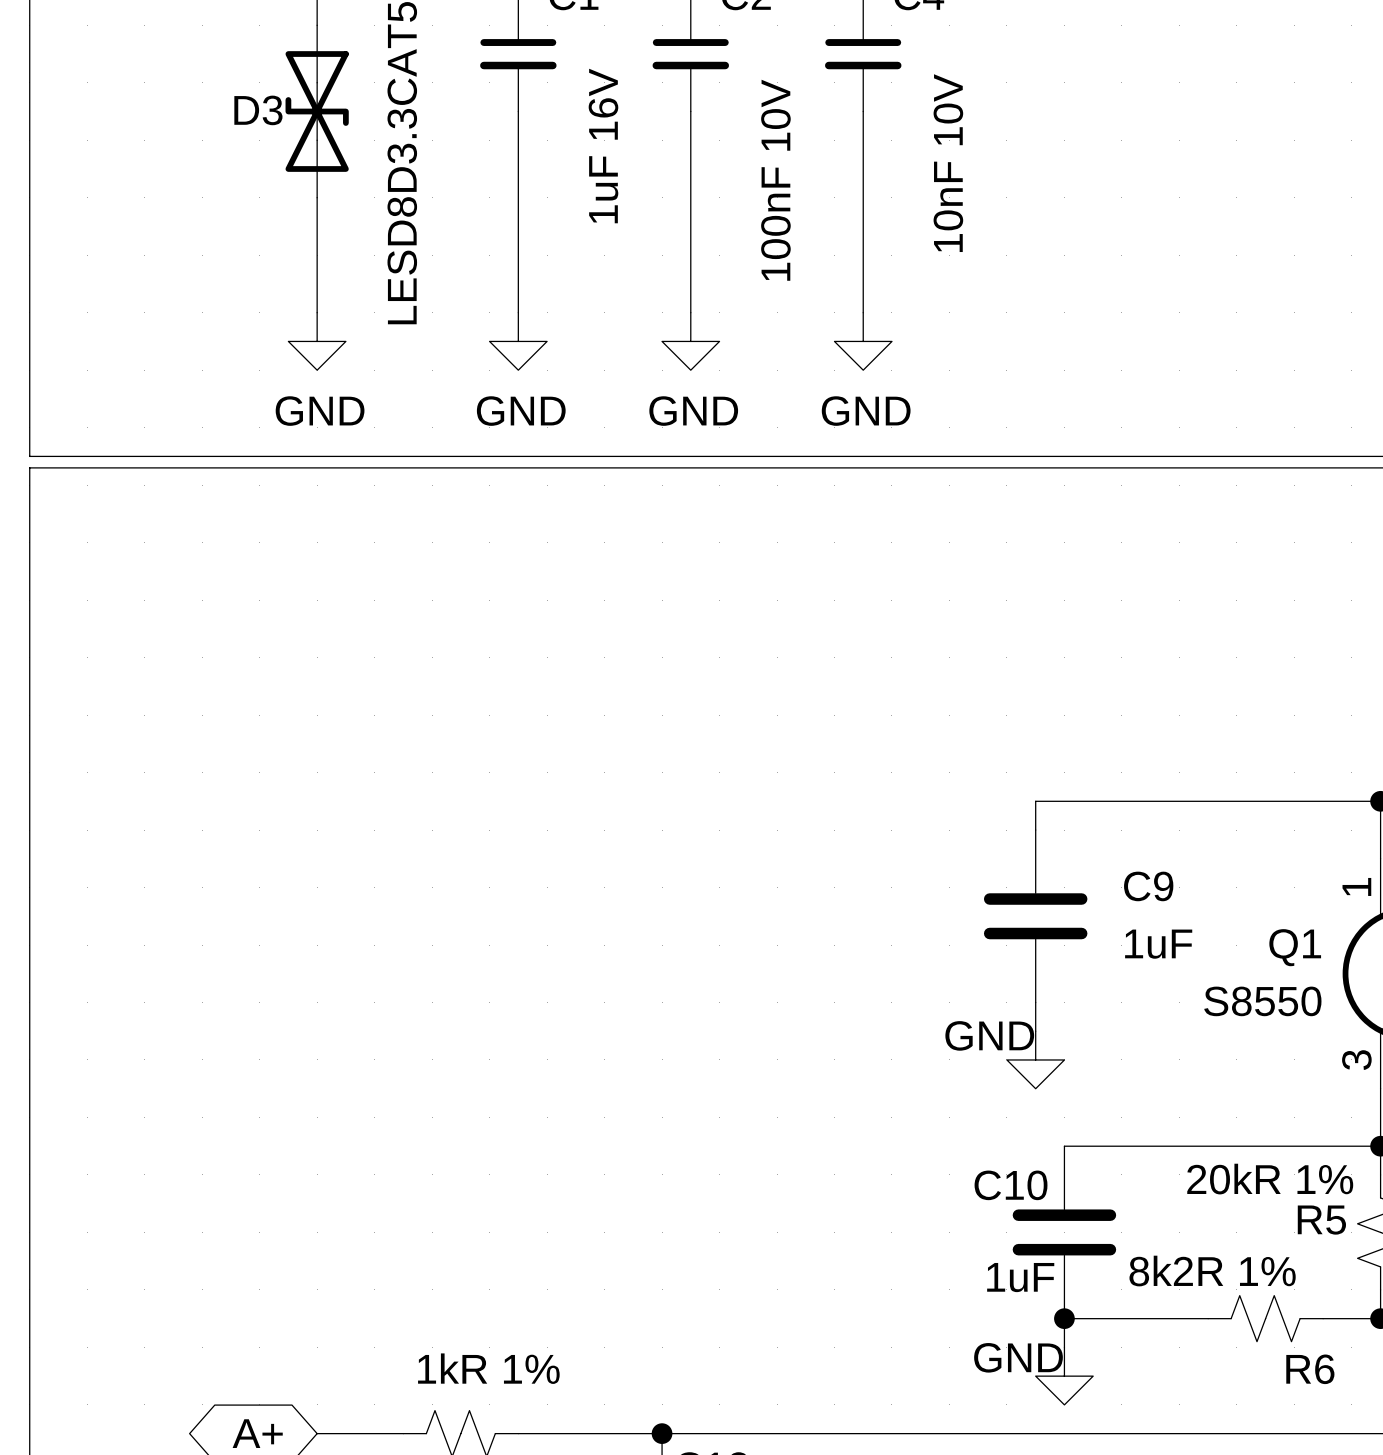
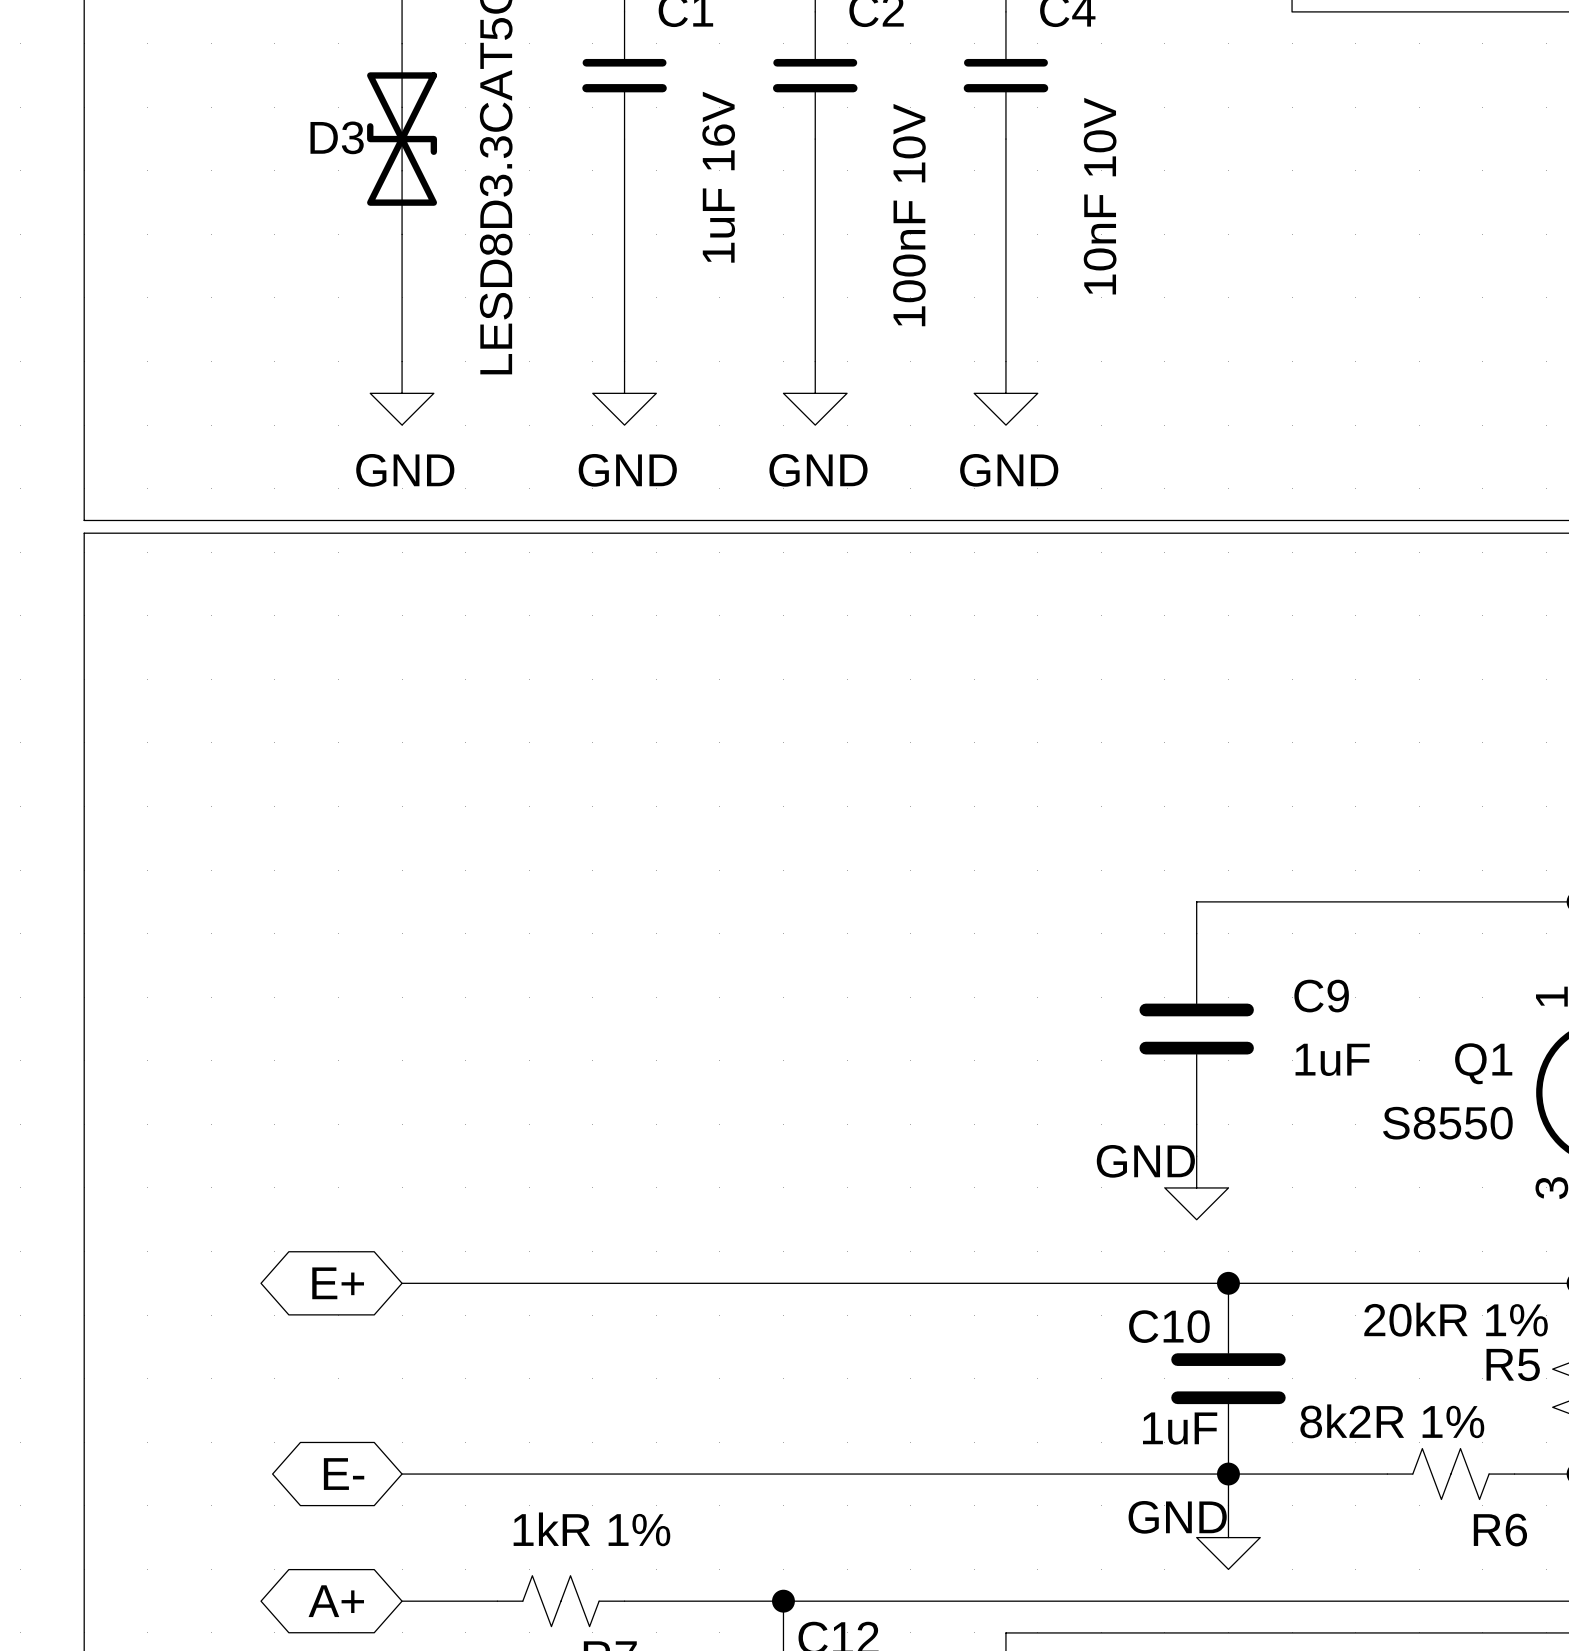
global label: none -> E+ (338, 1283)
wire: none -> (402, 1283) (1228, 1283)
junction: none -> (1228, 1283)
global label: none -> E- (344, 1474)
wire: none -> (402, 1474) (1228, 1474)

